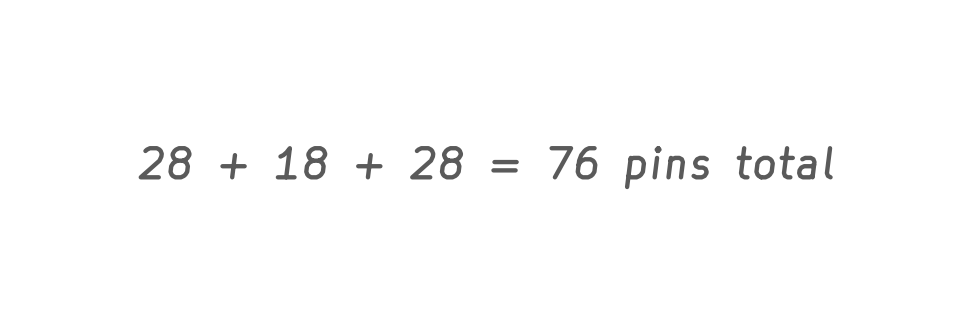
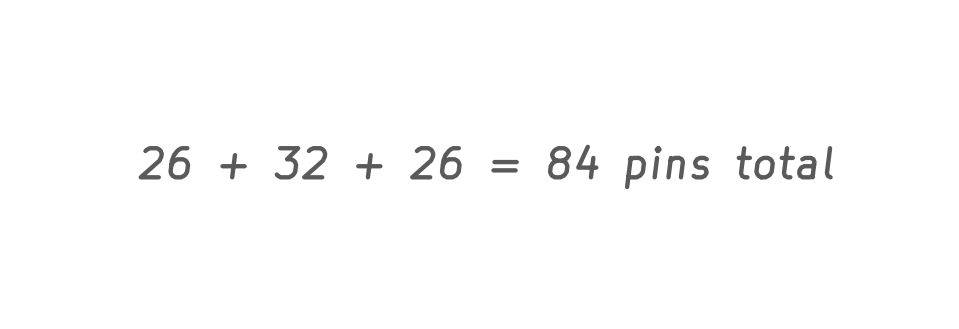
text: 28 + 18 + 28 = 76 pins total (485, 167) -> 26 + 32 + 26 = 84 pins total (485, 166)

